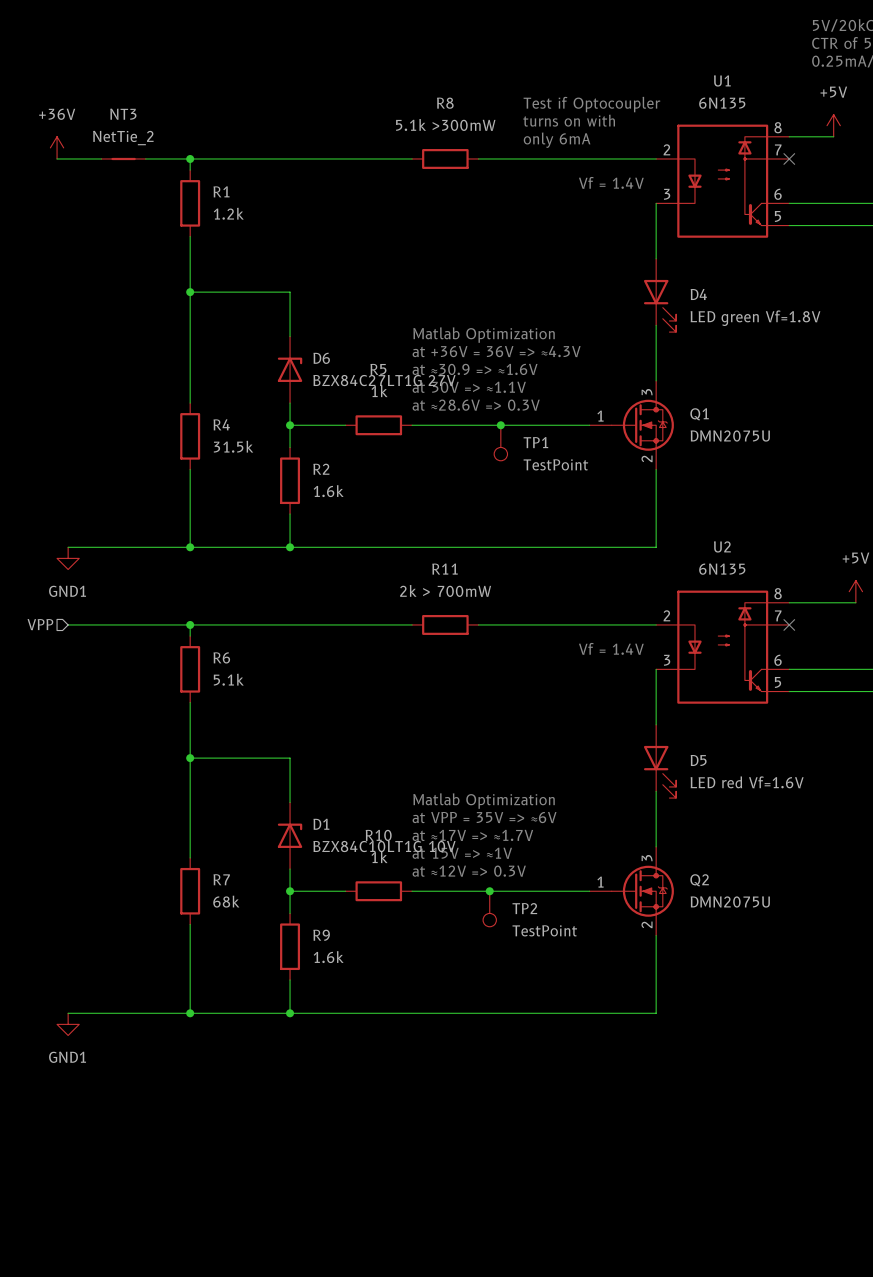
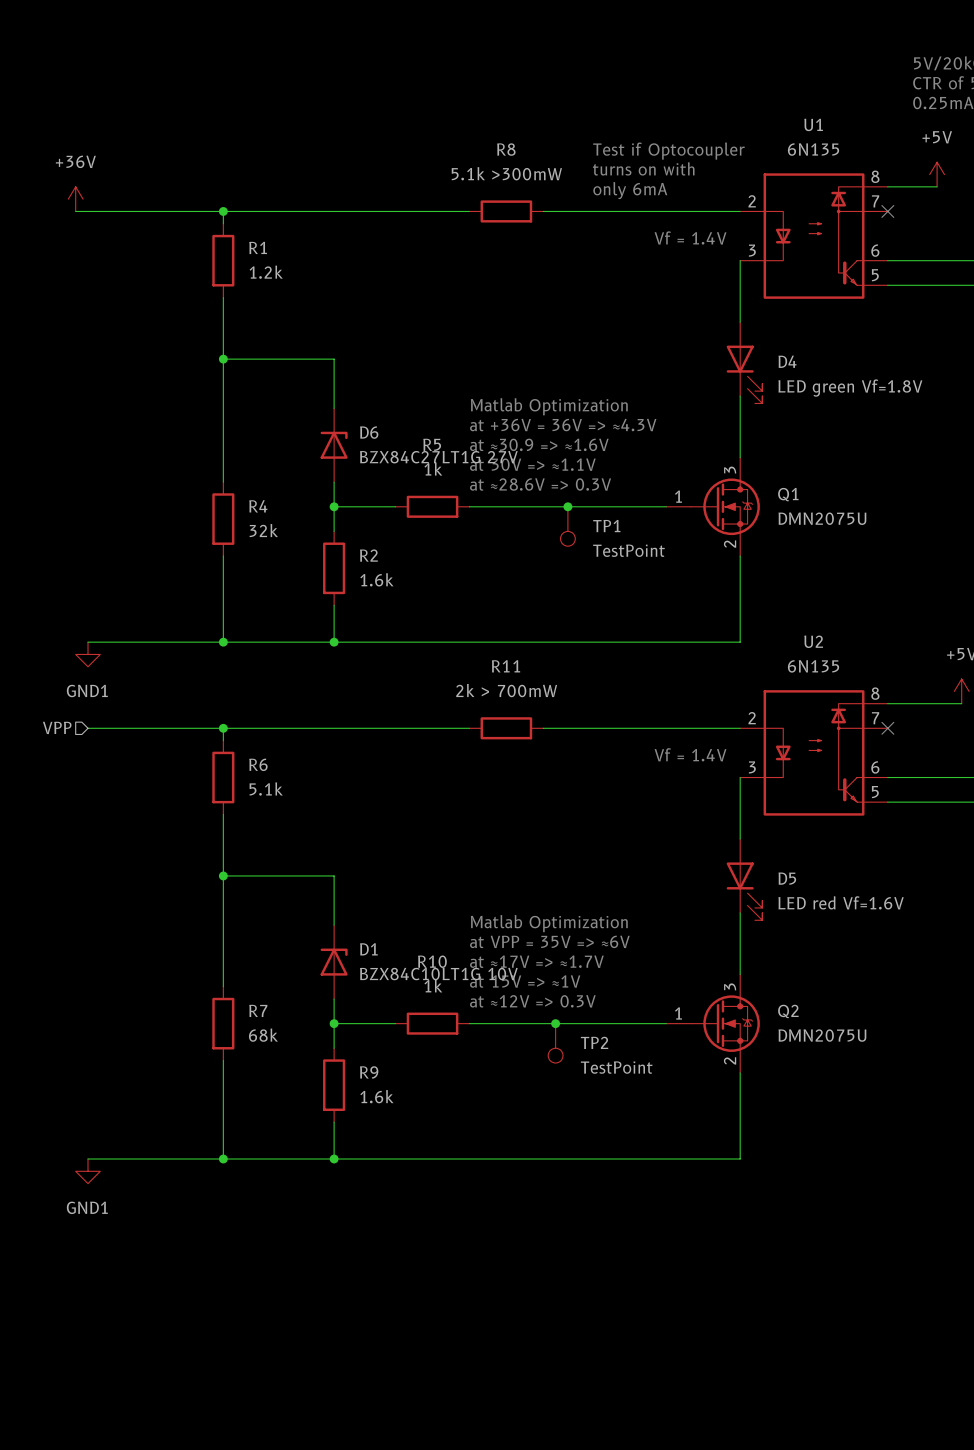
NT3: NetTie_2 (123, 158) -> none
R4 value: 31.5k (233, 446) -> 32k (263, 530)

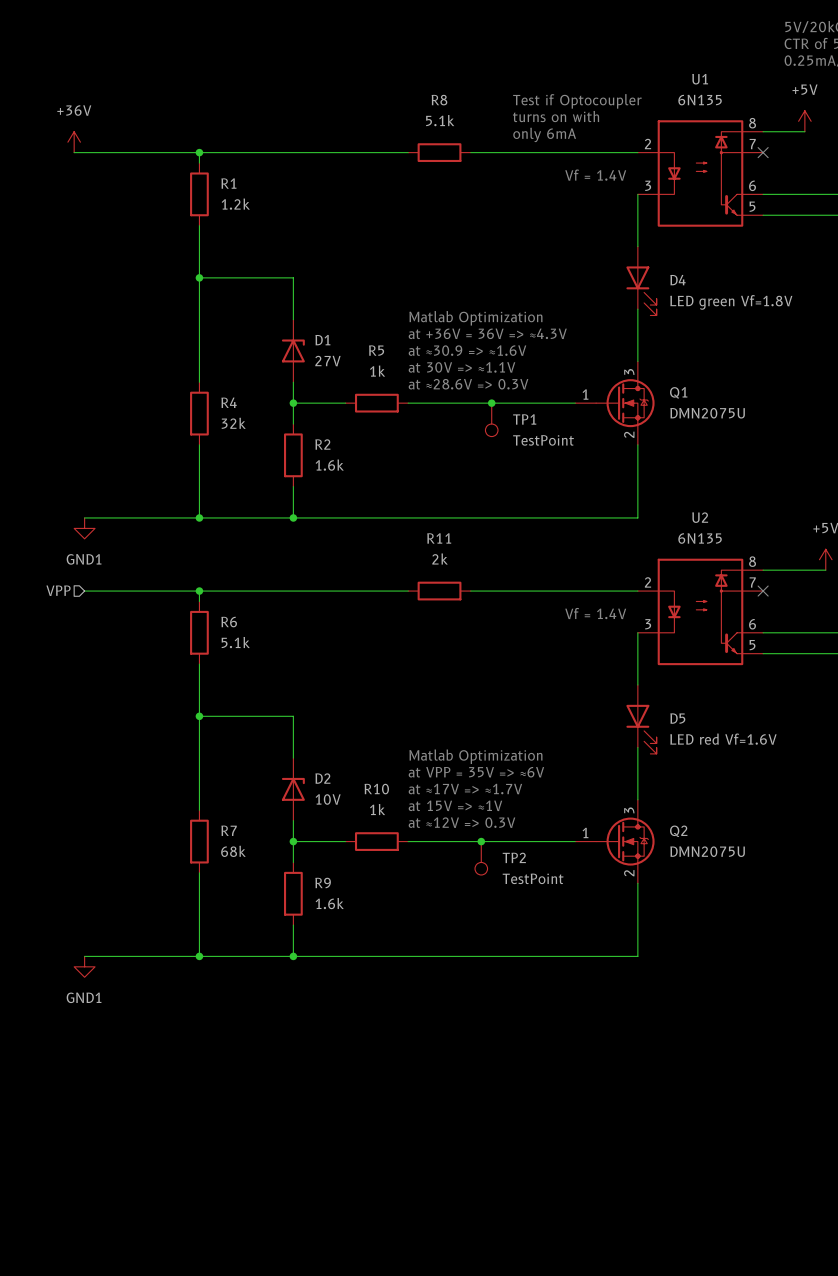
R8 value: 5.1k >300mW (506, 173) -> 5.1k (440, 120)
D6 name: D6 (369, 432) -> D1 (322, 340)
D6 value: BZX84C27LT1G 27V (438, 457) -> 27V (327, 361)
R11 value: 2k > 700mW (506, 690) -> 2k (440, 558)
D1 name: D1 (368, 949) -> D2 (322, 778)
D1 value: BZX84C10LT1G 10V (438, 974) -> 10V (328, 799)

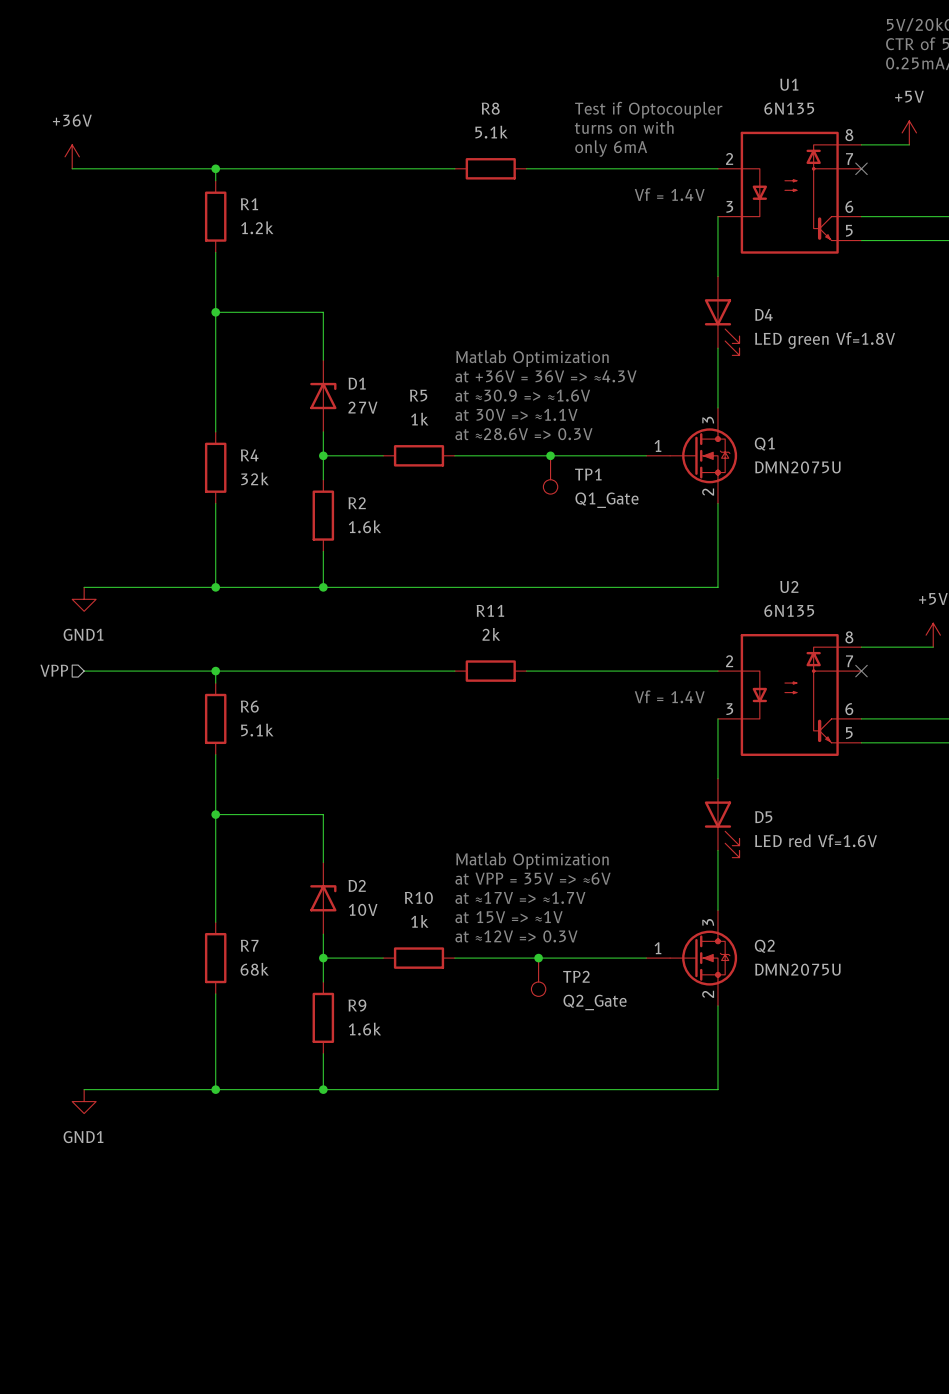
TP1 value: TestPoint (543, 440) -> Q1_Gate (606, 500)
TP2 value: TestPoint (533, 878) -> Q2_Gate (595, 1002)

